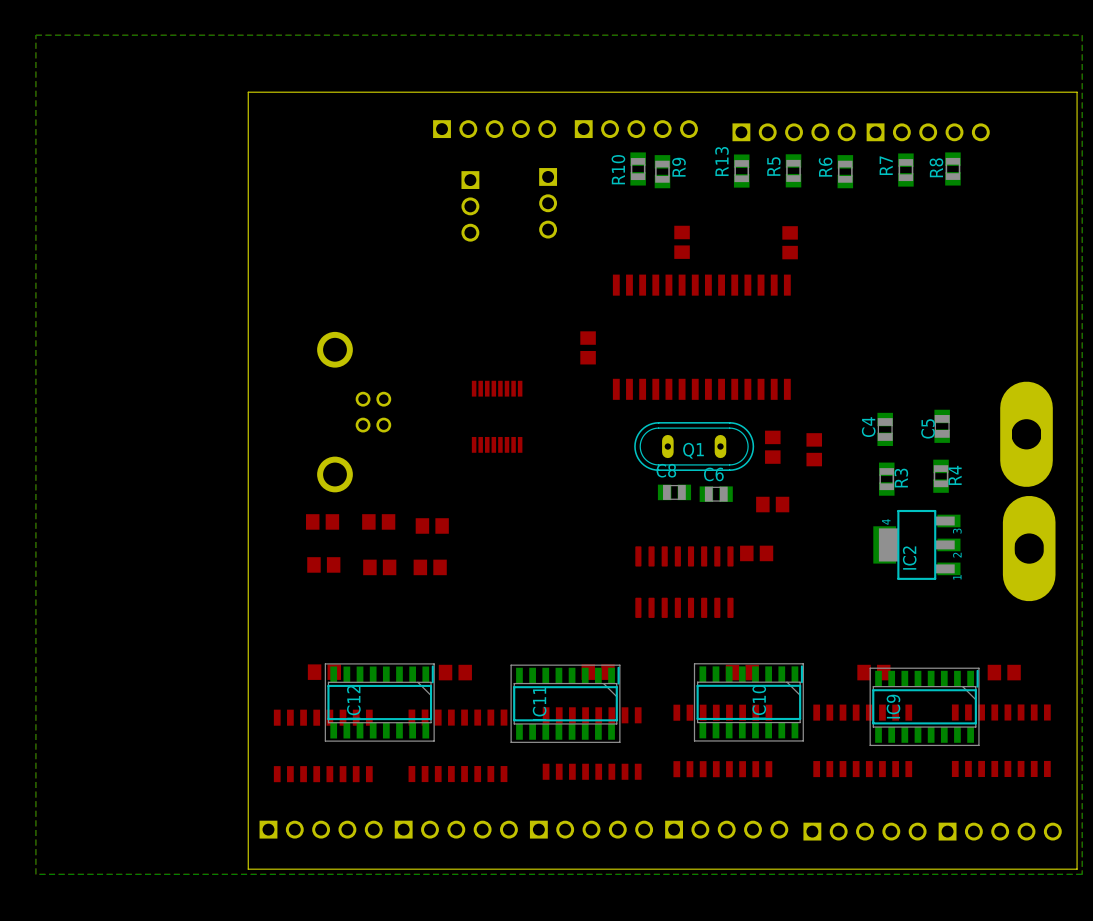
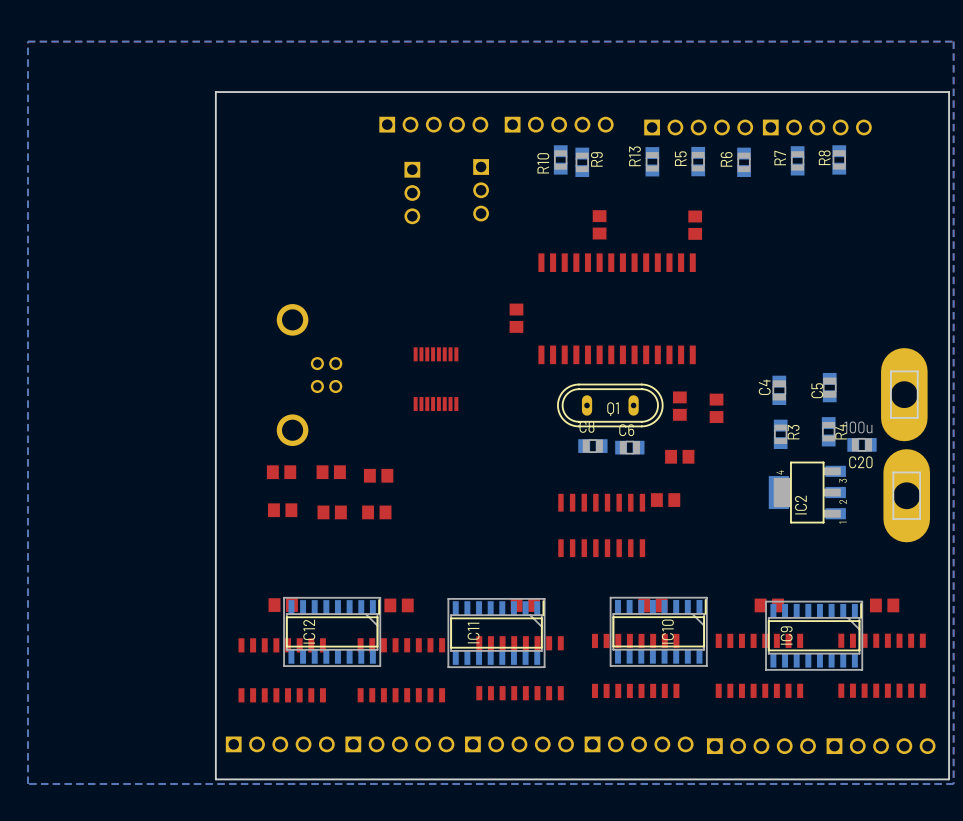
C20: none -> 100u (861, 444)

